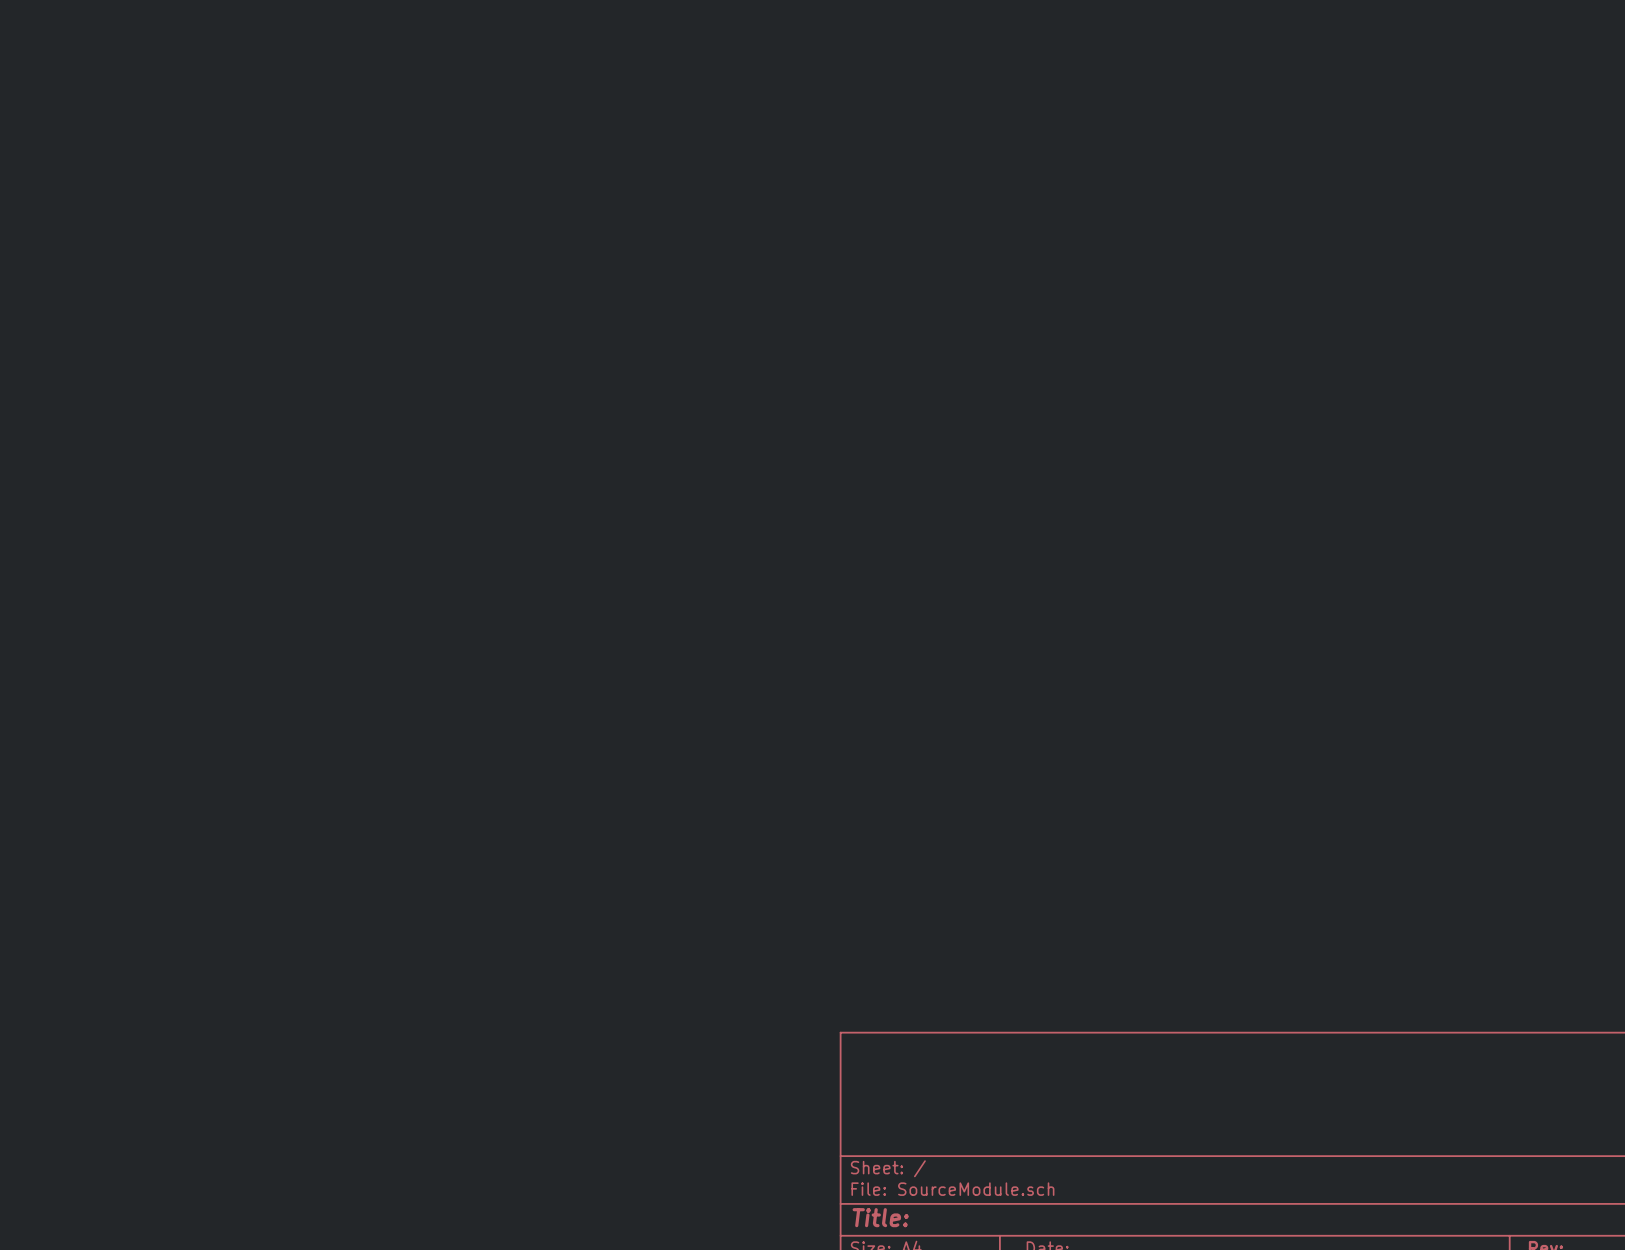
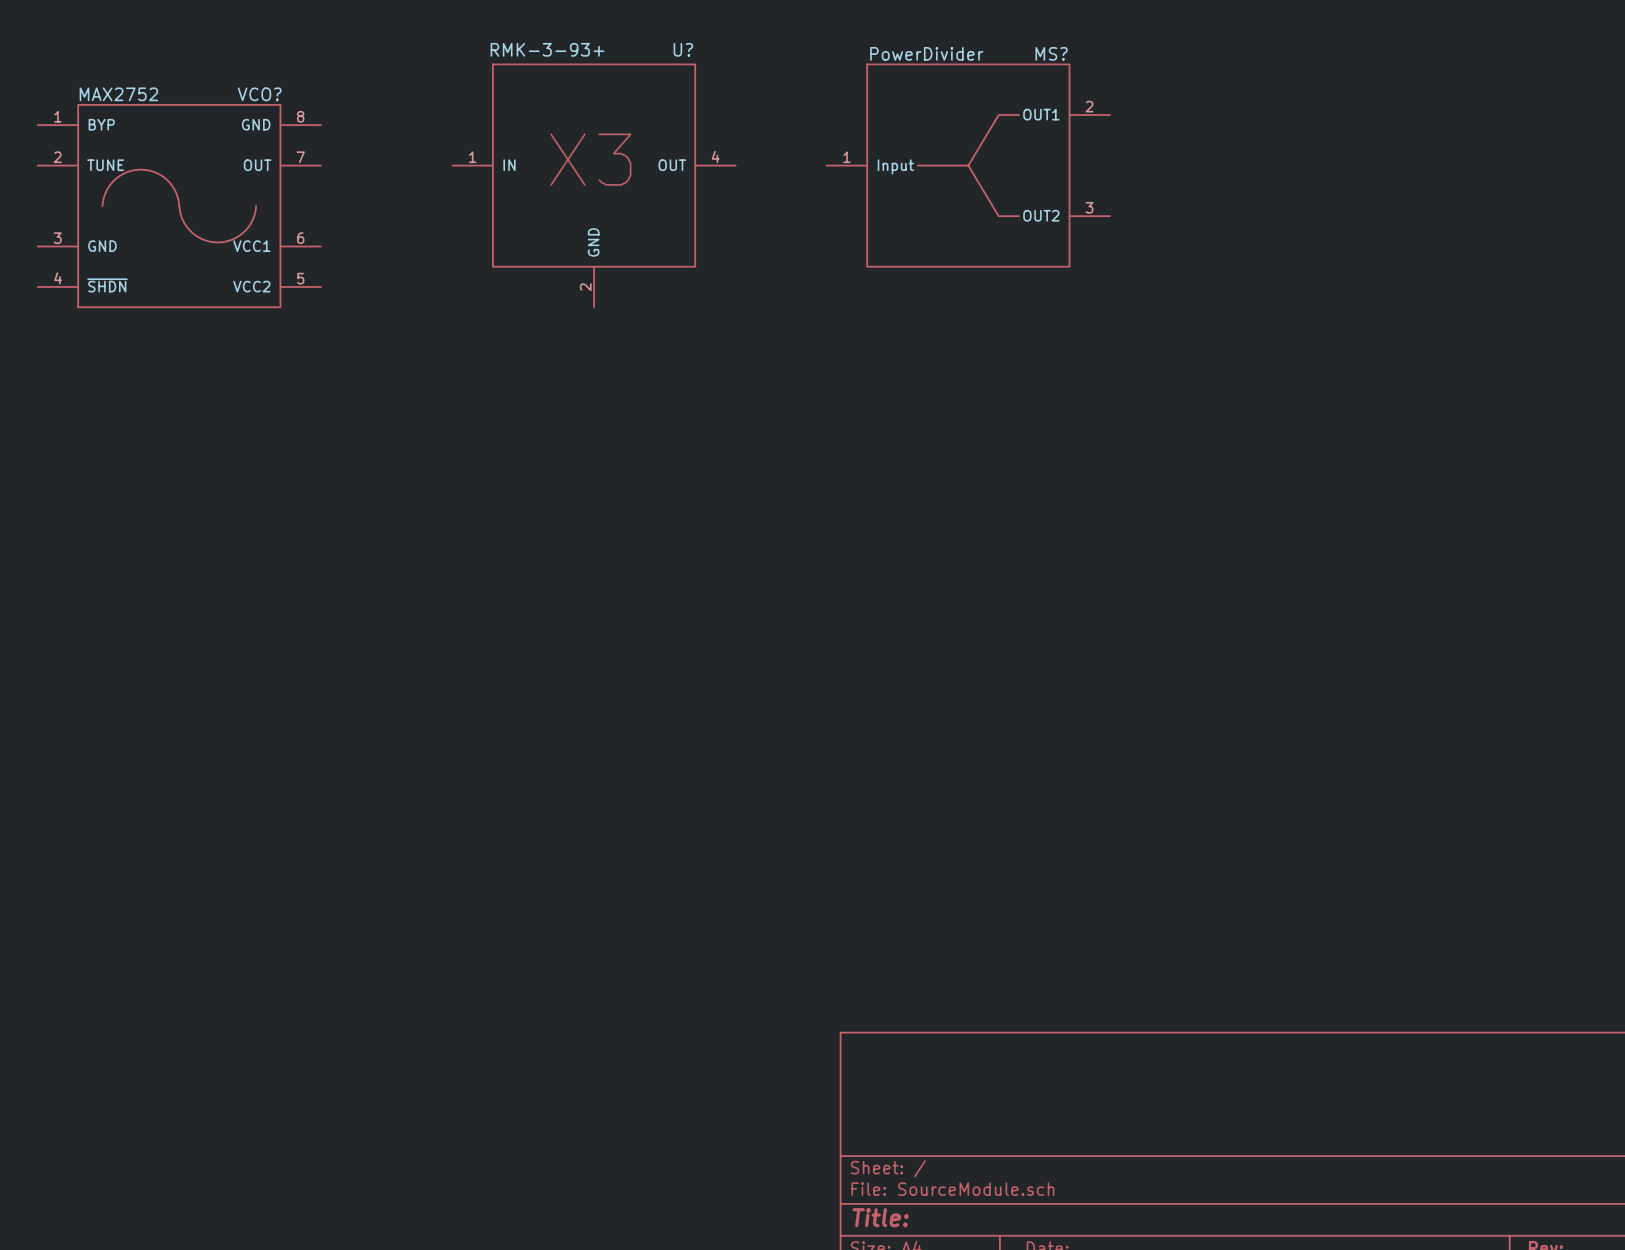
MS?: none -> PowerDivider (968, 165)
U?: none -> RMK-3-93+ (594, 185)
VCO?: none -> MAX2752 (179, 206)

